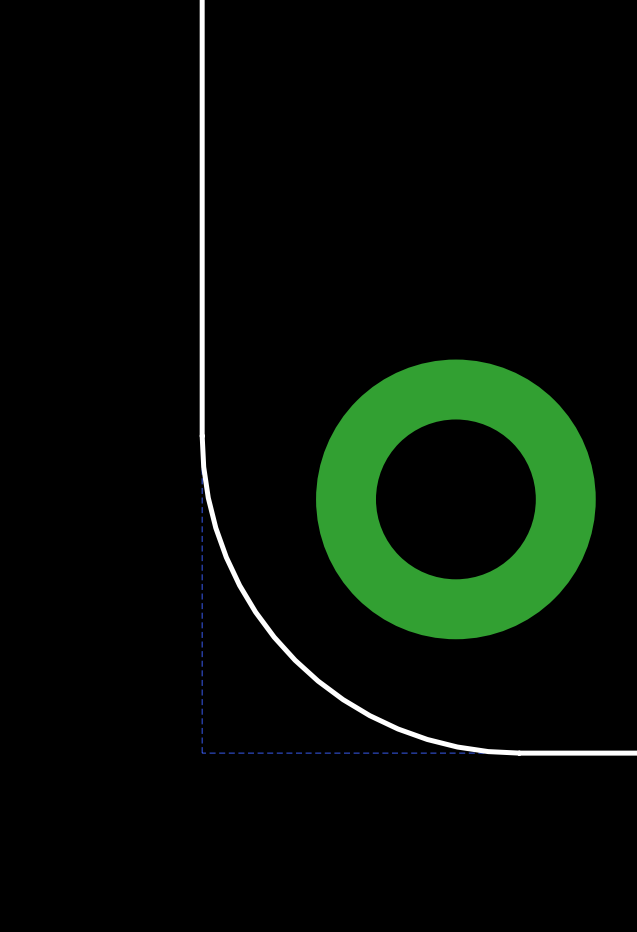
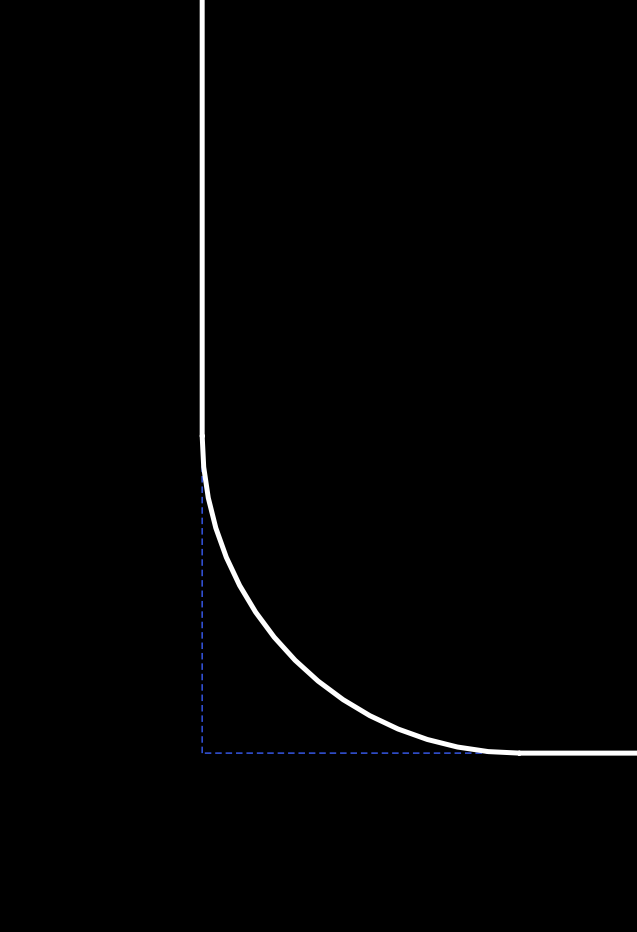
part: (455, 499) -> none

